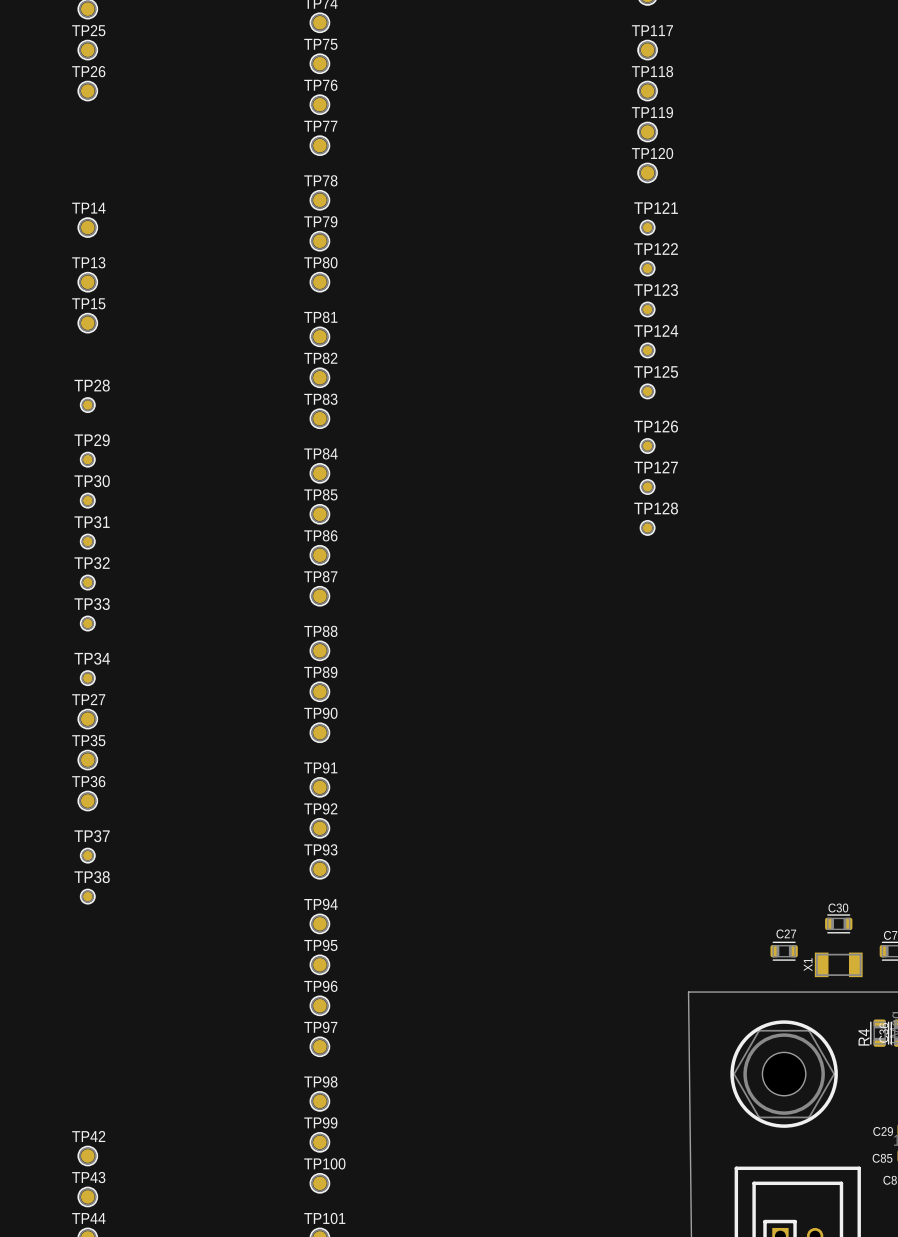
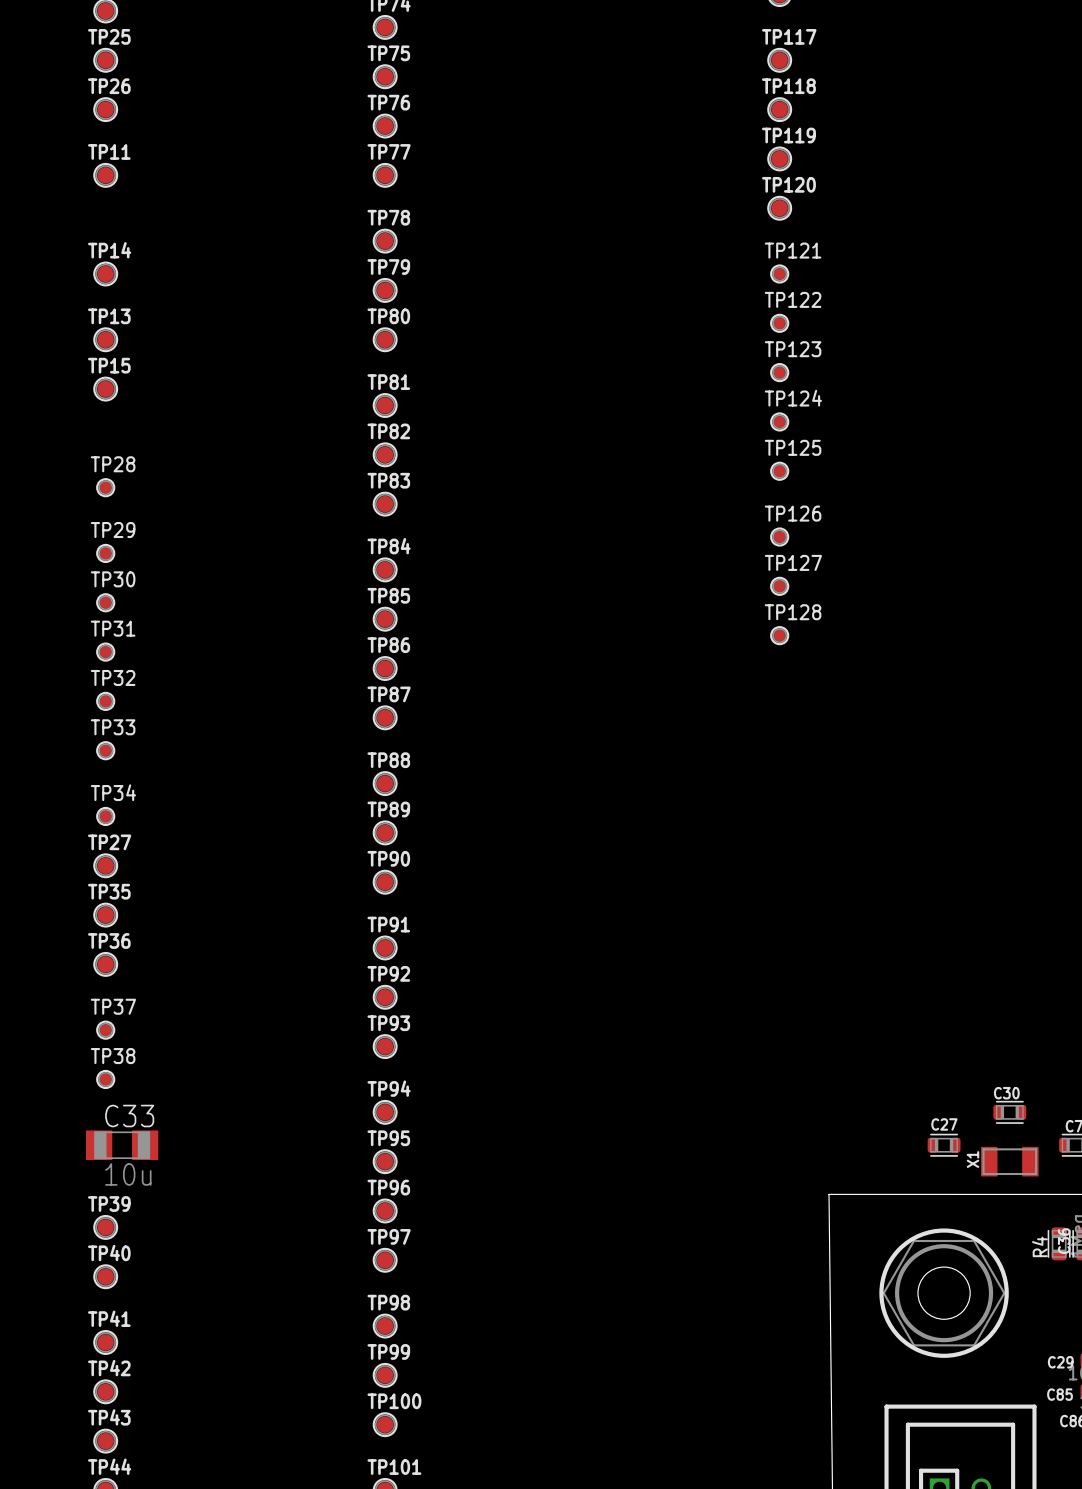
TP11: none -> (105, 175)
C33: none -> 10u (122, 1145)
TP39: none -> (105, 1227)
TP40: none -> (105, 1276)
TP41: none -> (105, 1342)

